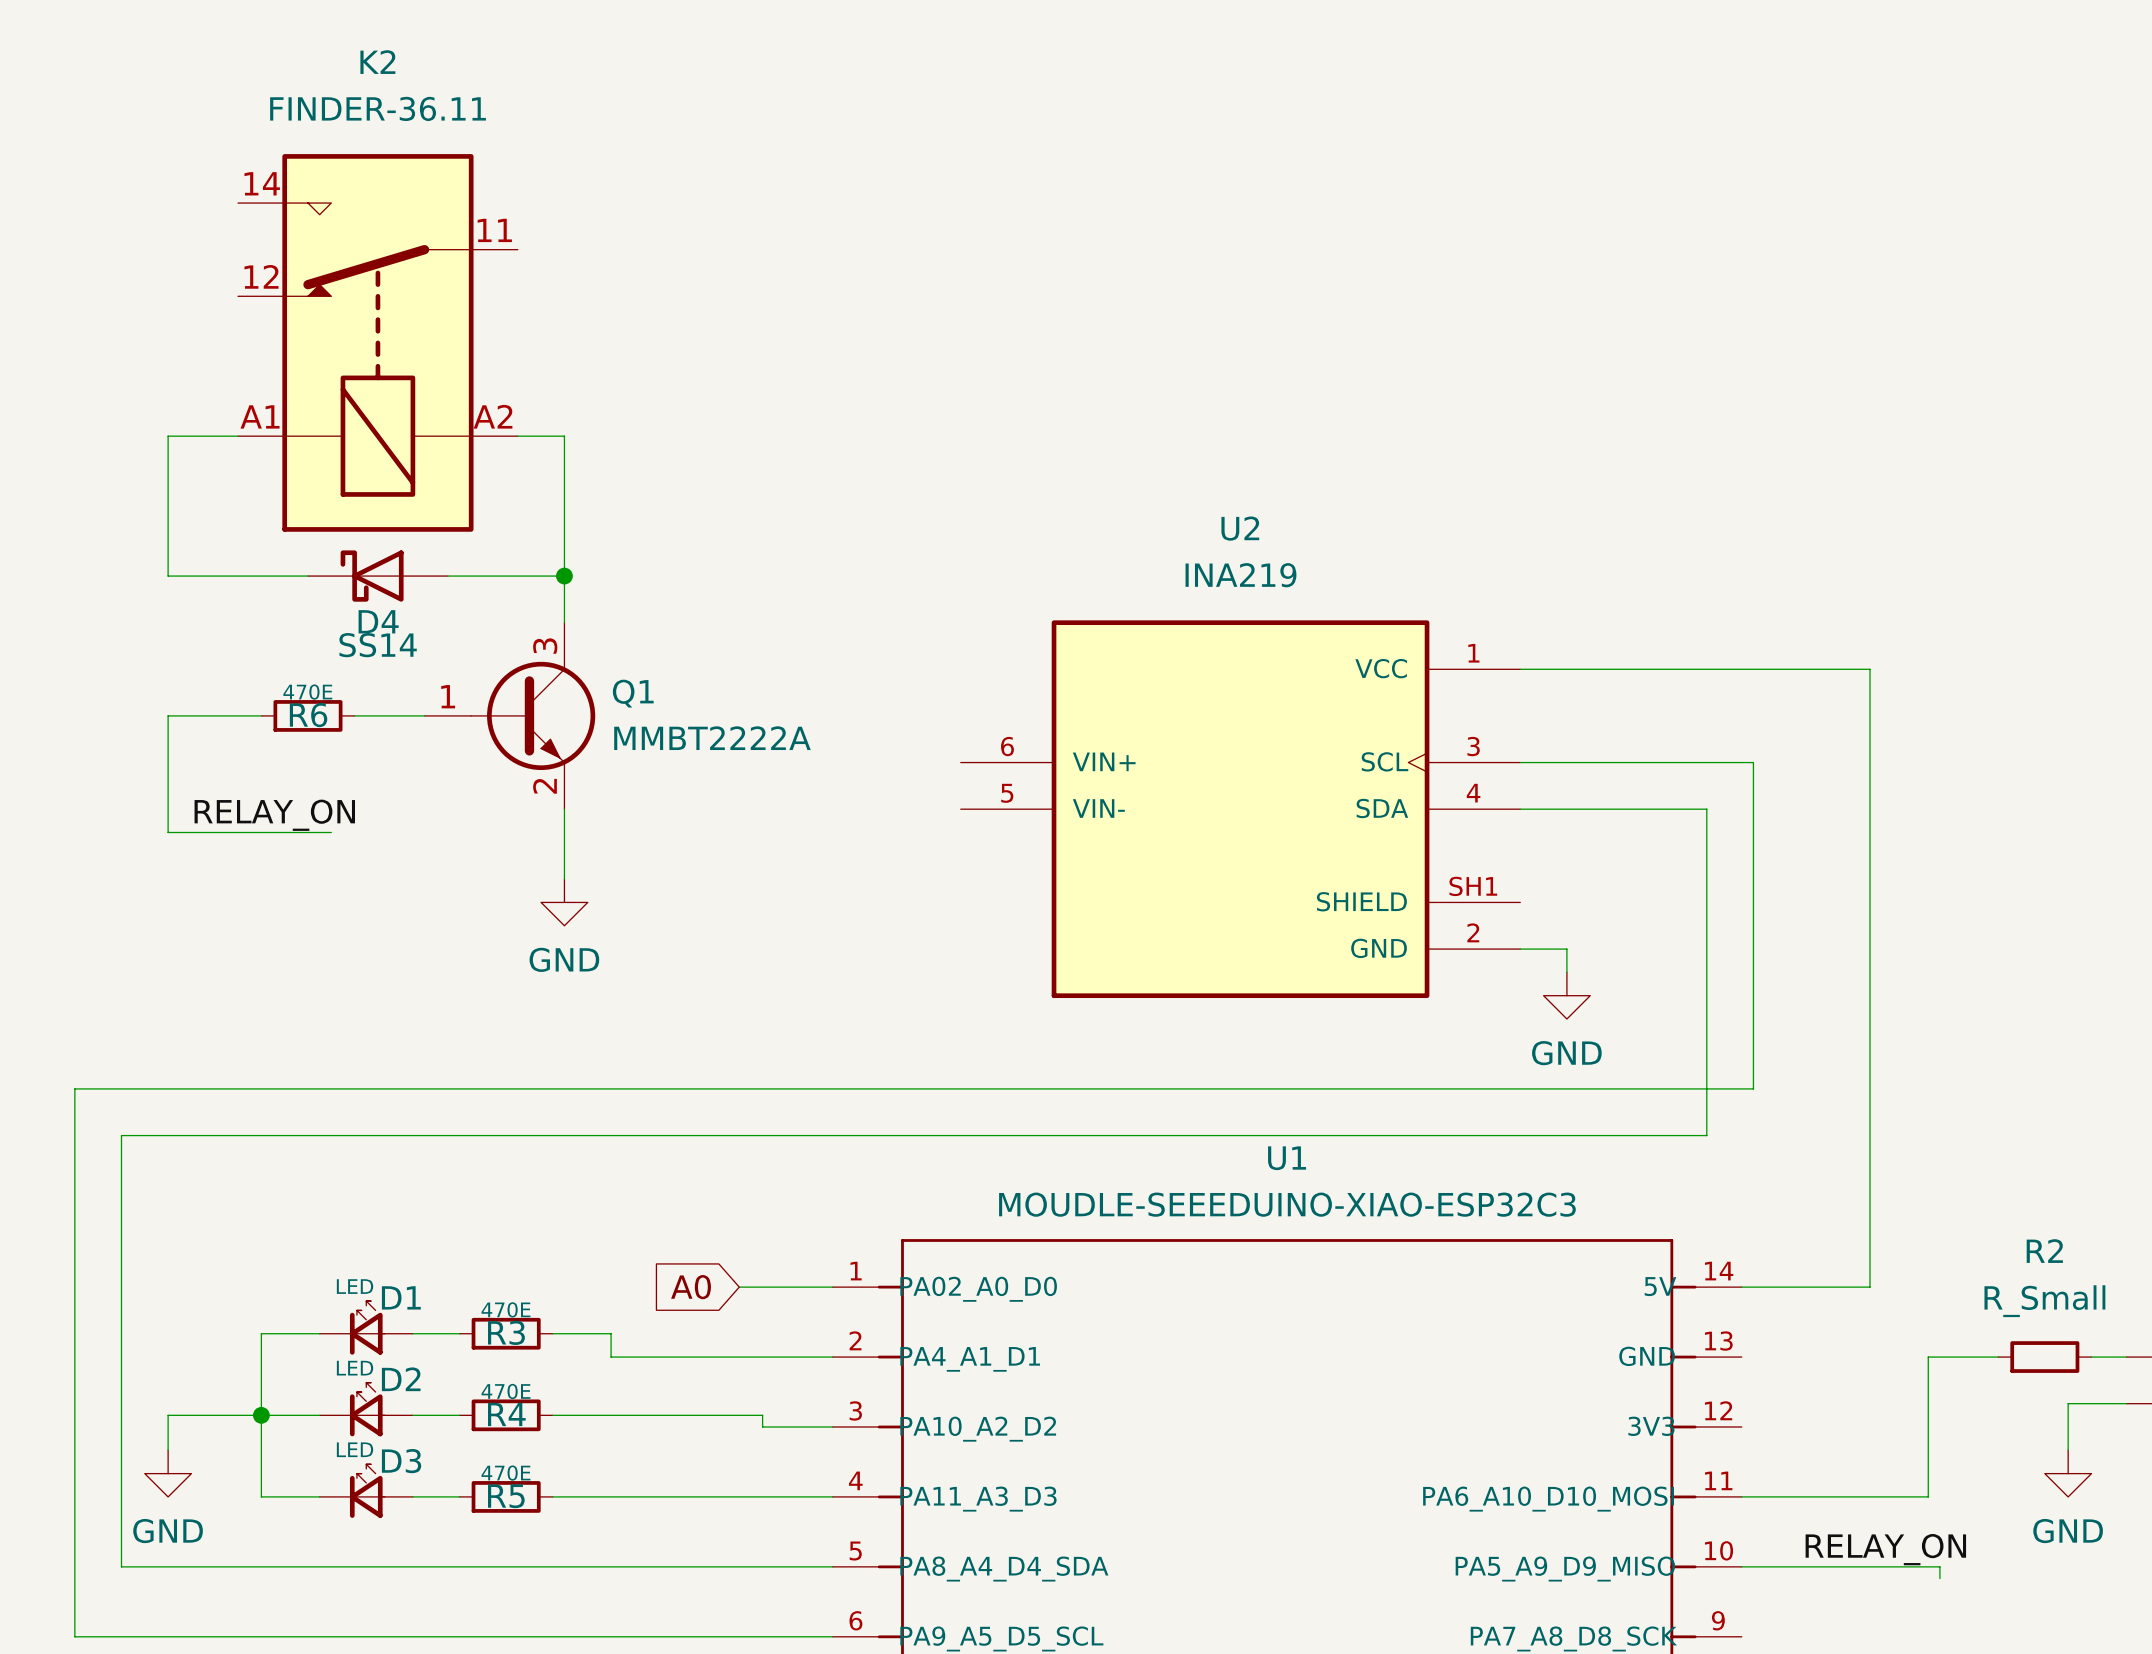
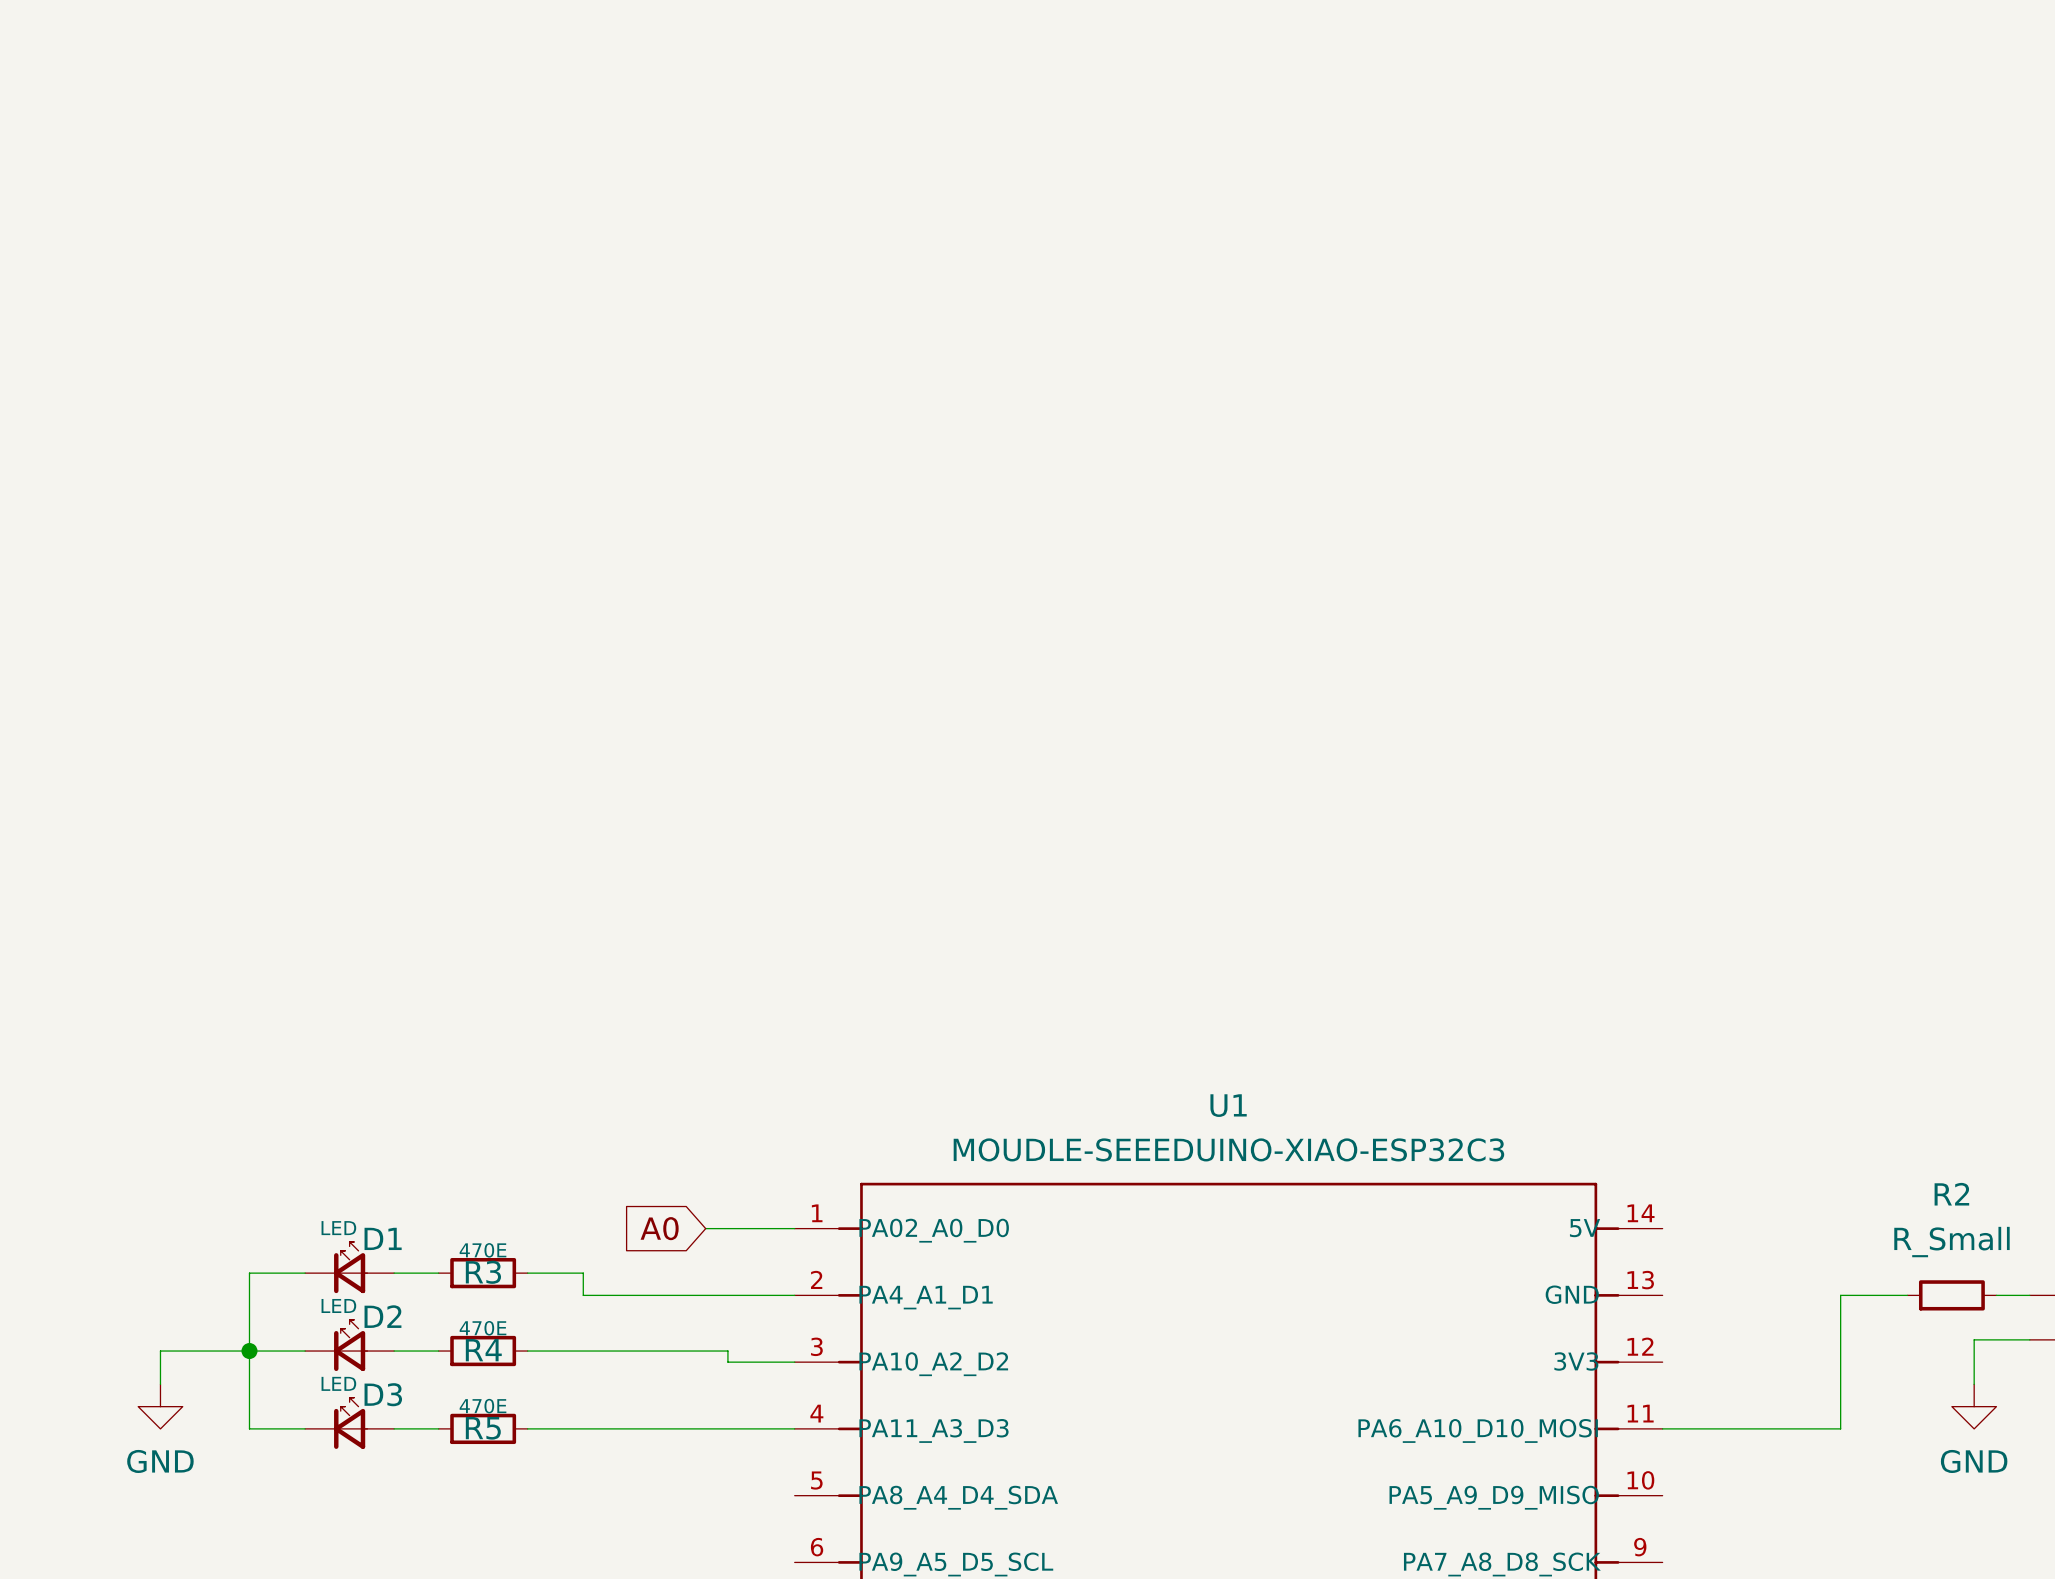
K2: FINDER-36.11 (377, 342) -> none
wire: (238, 436) (168, 436) (168, 576) (307, 576) -> none
wire: (517, 436) (564, 436) (564, 622) -> none
D4: SS14 (377, 576) -> none
wire: (447, 576) (564, 576) -> none
junction: (564, 576) -> none
wire: (1520, 669) (1869, 669) (1869, 1287) (1741, 1287) -> none
wire: (261, 715) (168, 715) (168, 832) (331, 832) -> none
R6: 470E (307, 715) -> none
wire: (354, 715) (424, 715) -> none
Q1: MMBT2222A (509, 715) -> none
wire: (1520, 762) (1753, 762) (1753, 1088) (74, 1088) (74, 1636) (832, 1636) -> none
wire: (564, 809) (564, 879) -> none
U2: INA219 (1240, 809) -> none
wire: (1520, 809) (1706, 809) (1706, 1135) (121, 1135) (121, 1566) (832, 1566) -> none
label: RELAY_ON (274, 815) -> none
power symbol: GND (564, 902) -> none
wire: (1520, 949) (1566, 949) (1566, 972) -> none
power symbol: GND (1566, 995) -> none
label: RELAY_ON (1885, 1549) -> none
wire: (1741, 1566) (1939, 1566) (1939, 1578) -> none

